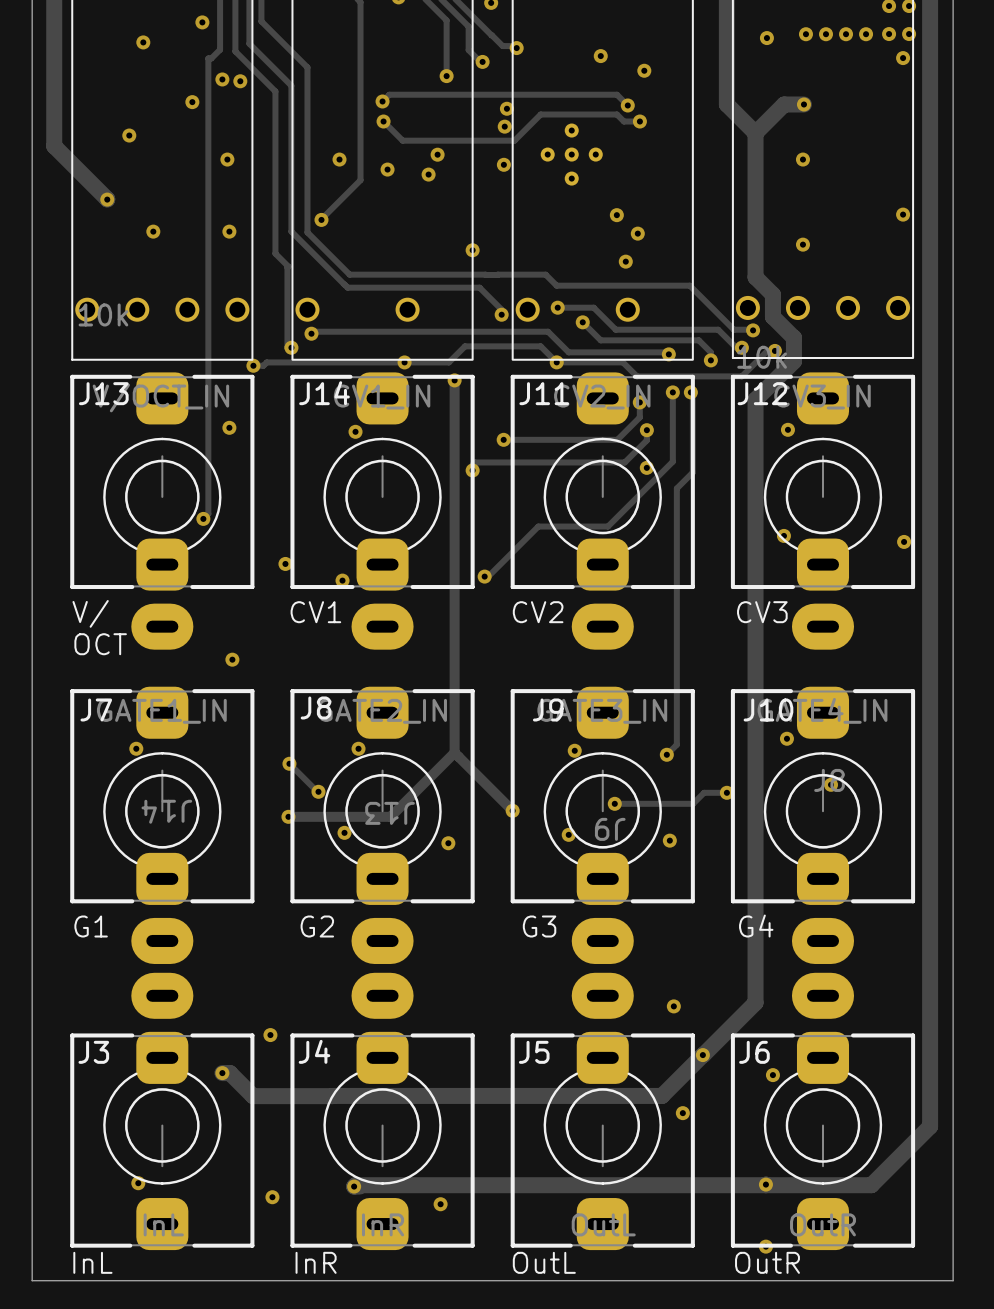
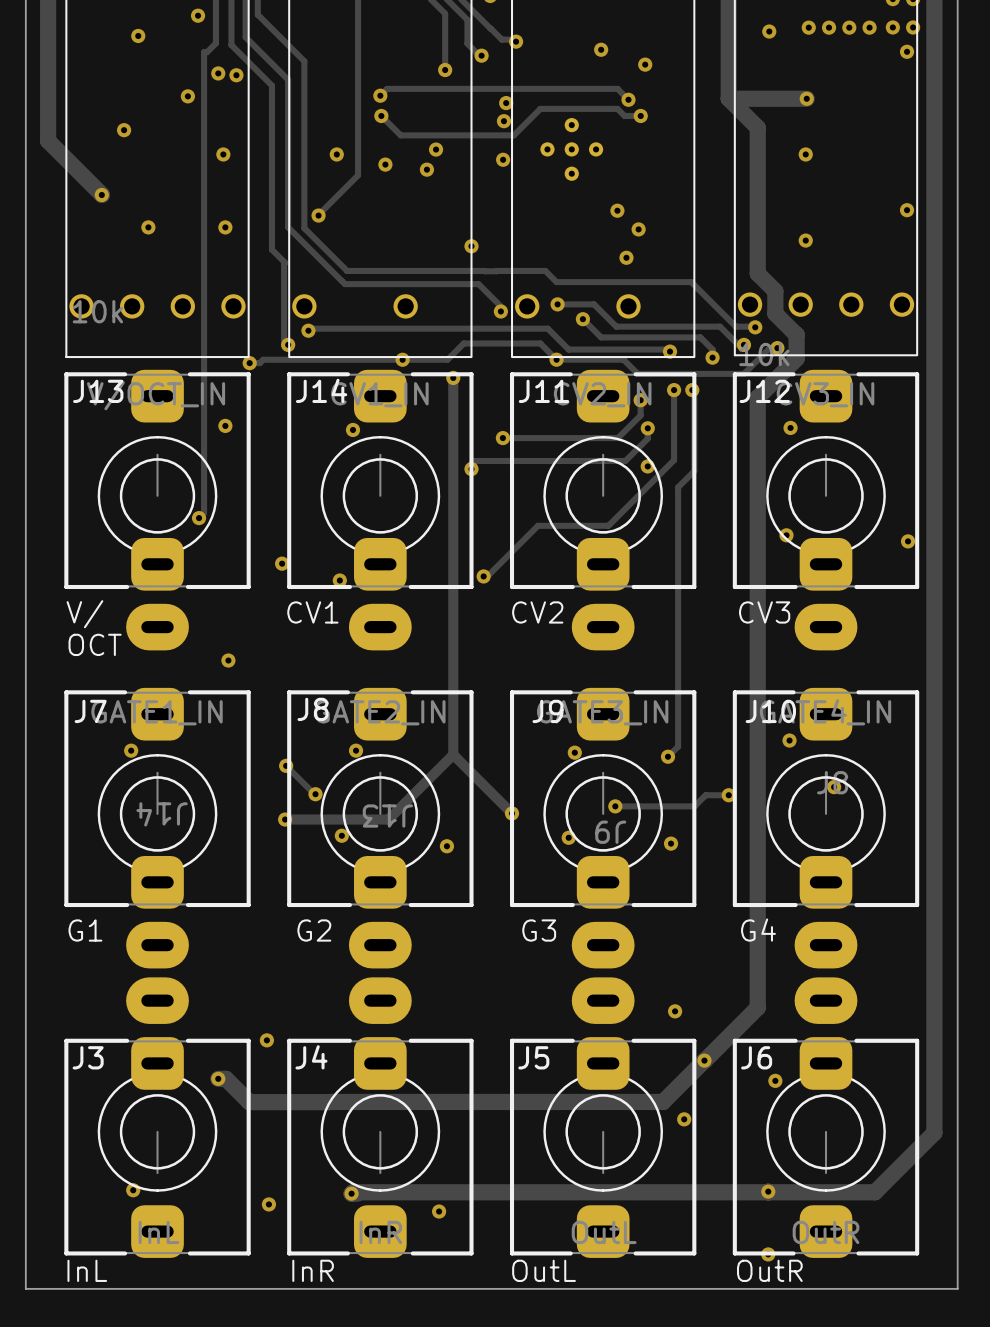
track: (784, 104) (755, 133) -> (786, 98) (728, 98)

